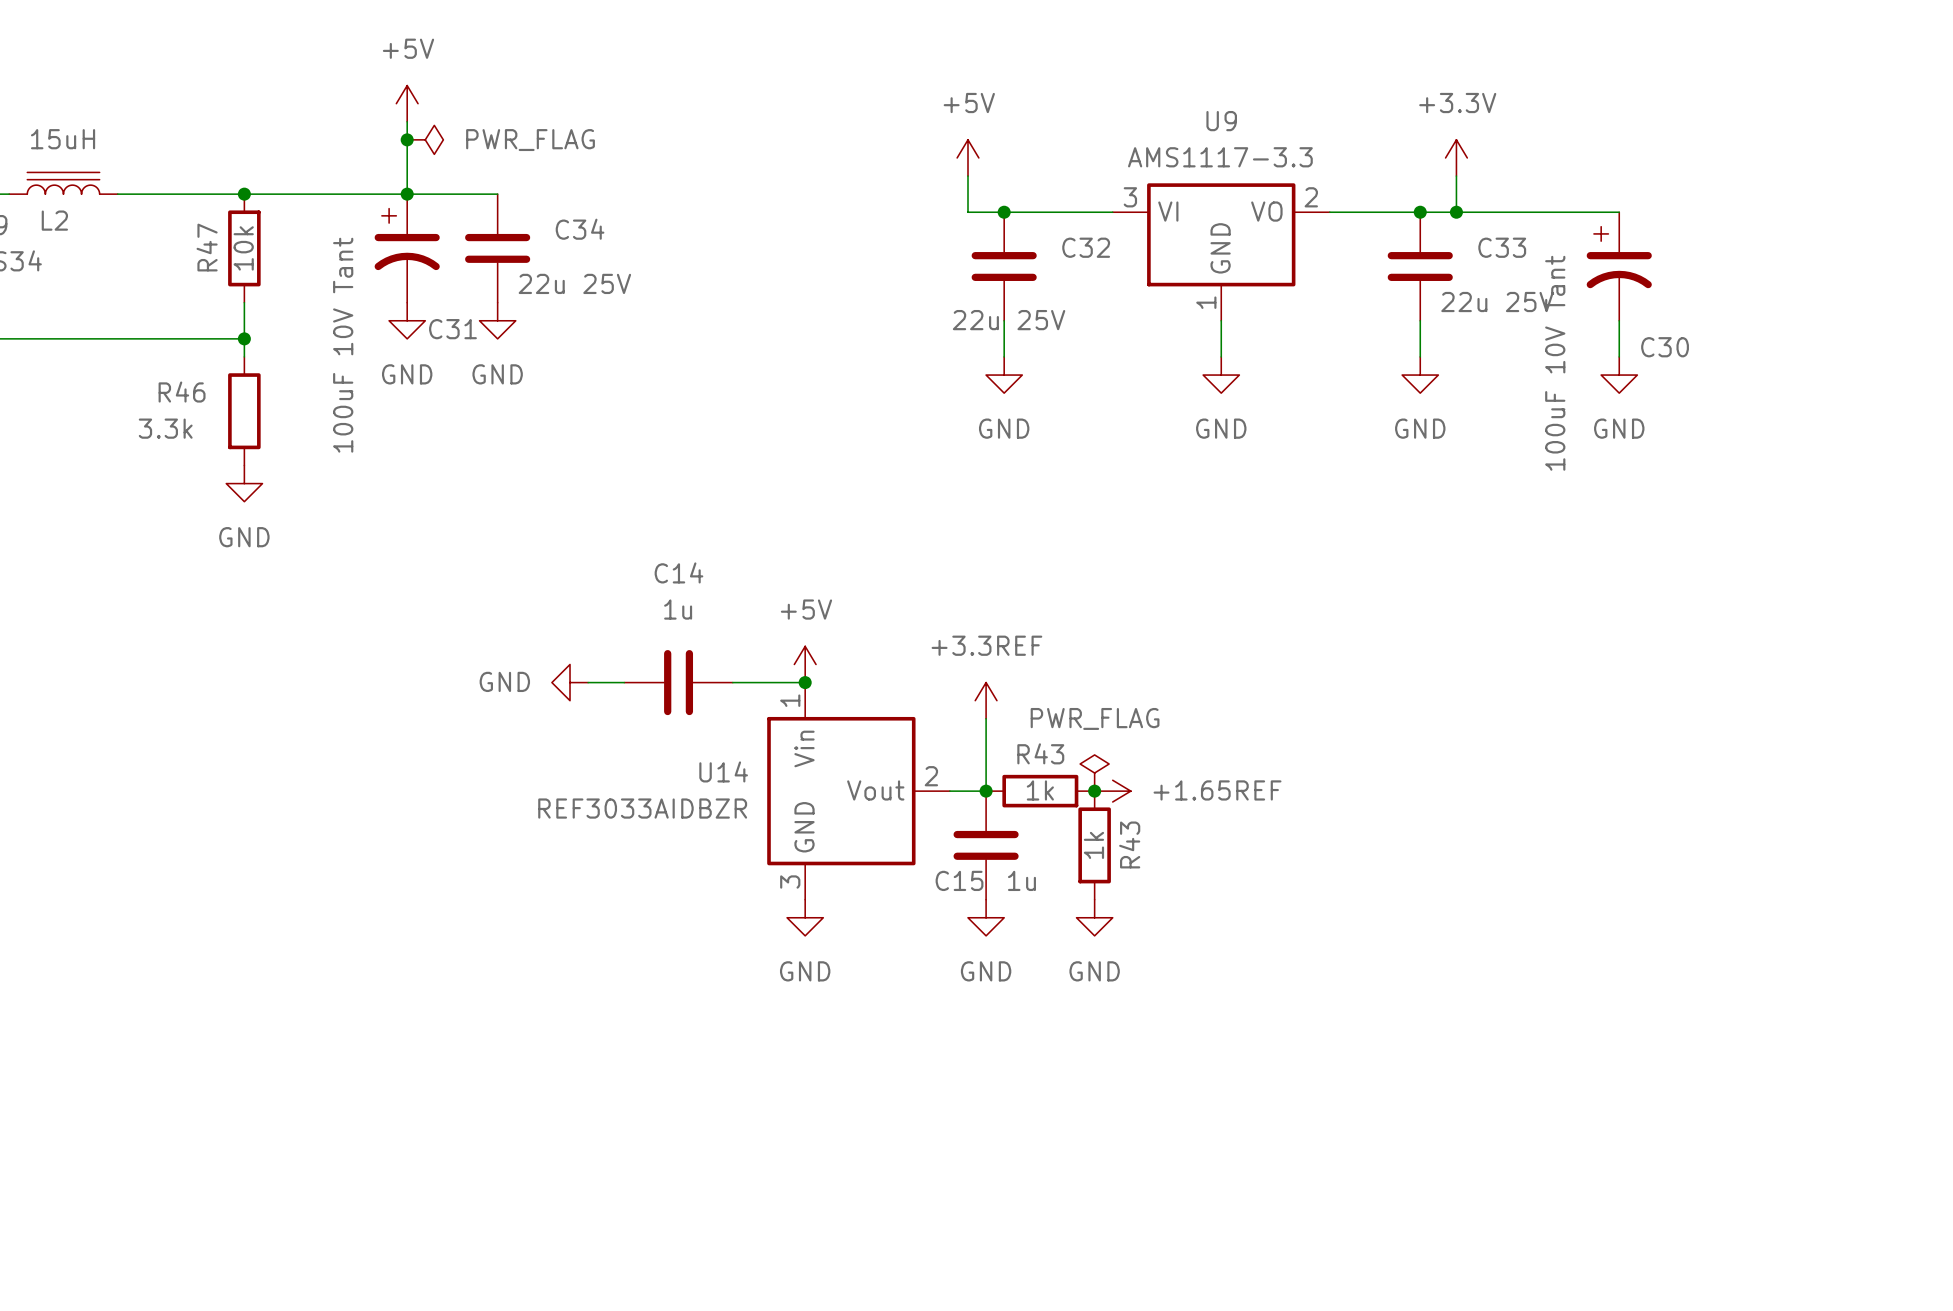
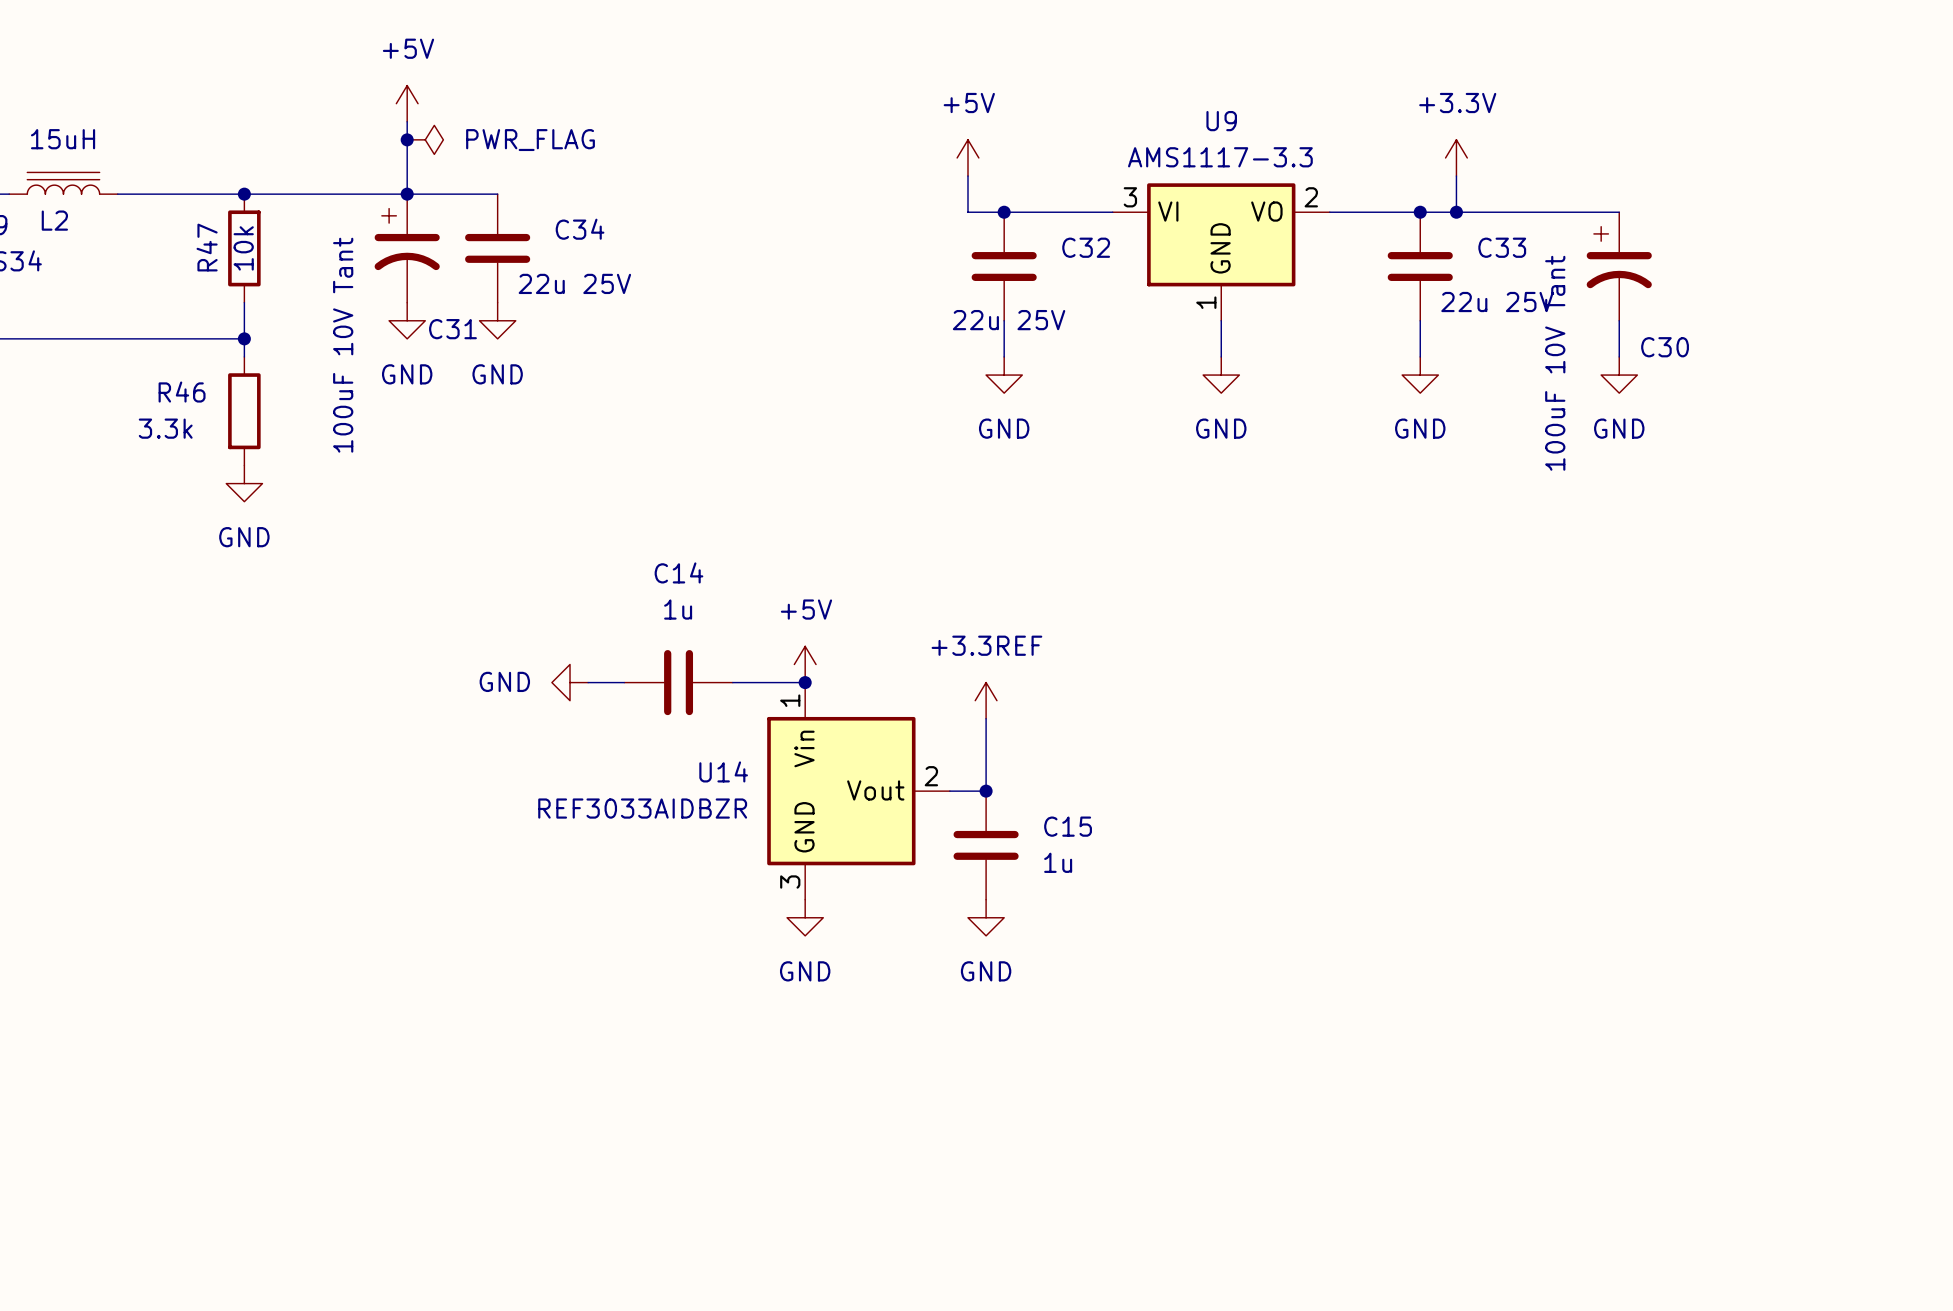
power symbol: PWR_FLAG (1094, 773) -> none
R43: 1k (1040, 791) -> none
junction: (1094, 791) -> none
power symbol: +1.65REF (1112, 791) -> none
R43: 1k (1094, 845) -> none
C15 name position: C15 (959, 880) -> C15 (1068, 826)
C15 value position: 1u (1021, 880) -> 1u (1058, 862)
power symbol: GND (1094, 917) -> none

